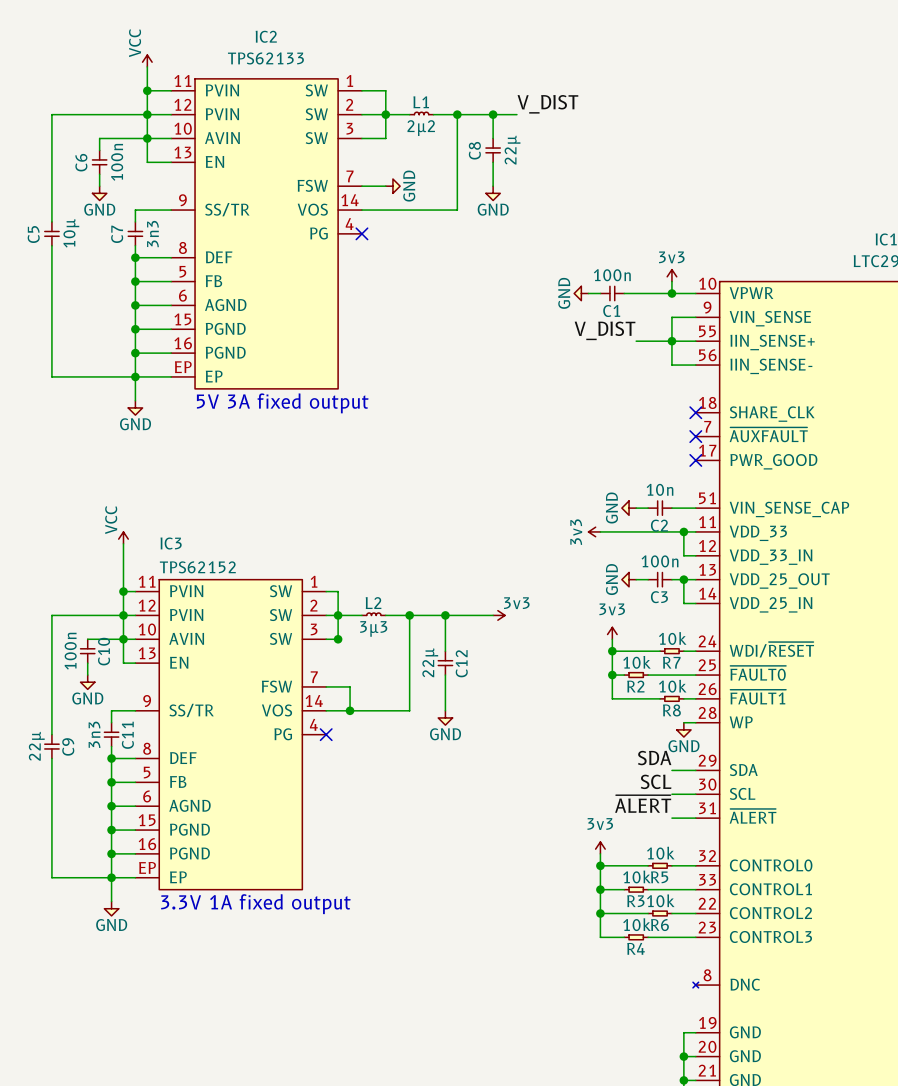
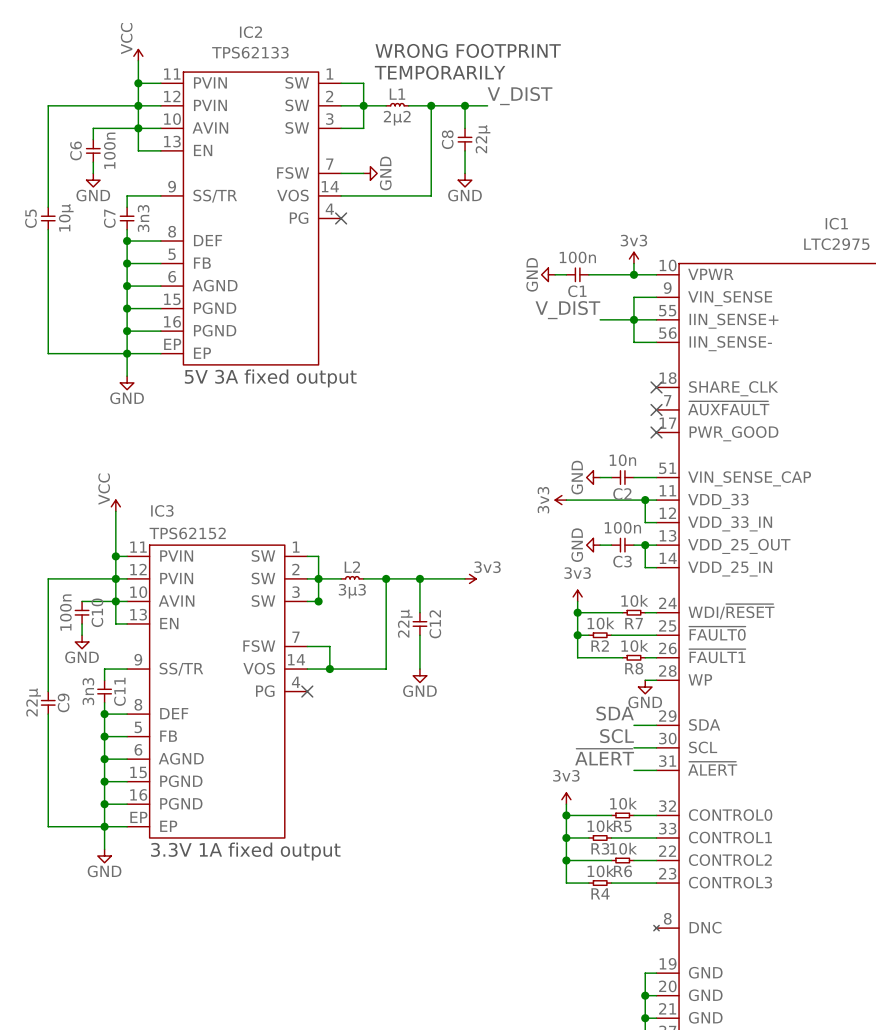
text: none -> WRONG FOOTPRINT (468, 50)
text: none -> TEMPORARILY (440, 72)

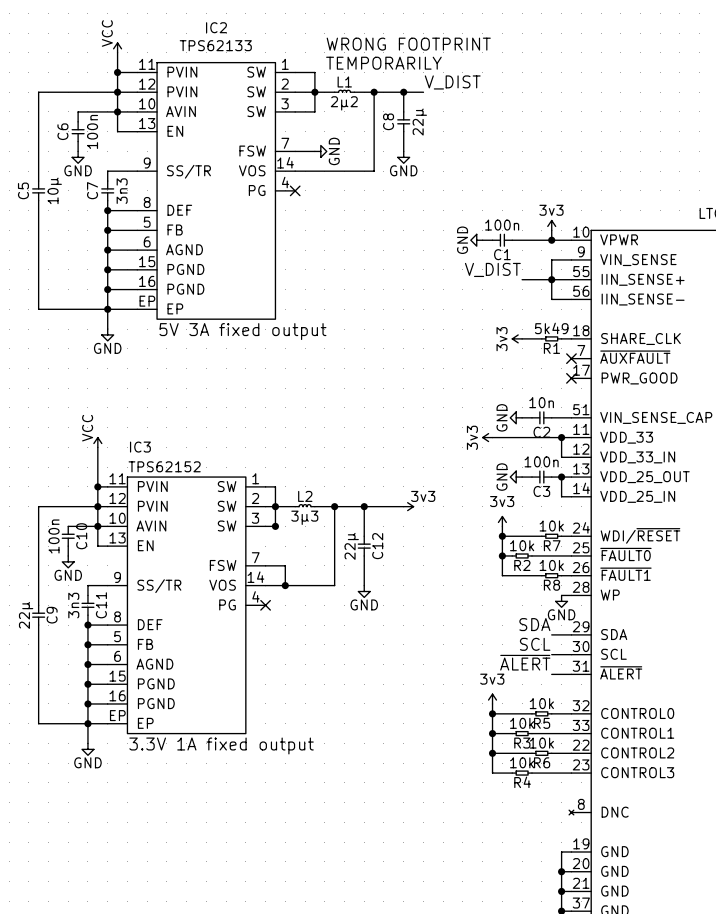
power symbol: none -> 3v3 (517, 338)
wire: none -> (522, 338) (541, 338)
R1: none -> 5k49 (551, 338)
wire: none -> (561, 338) (571, 338)
no-connect mark: (656, 387) -> none

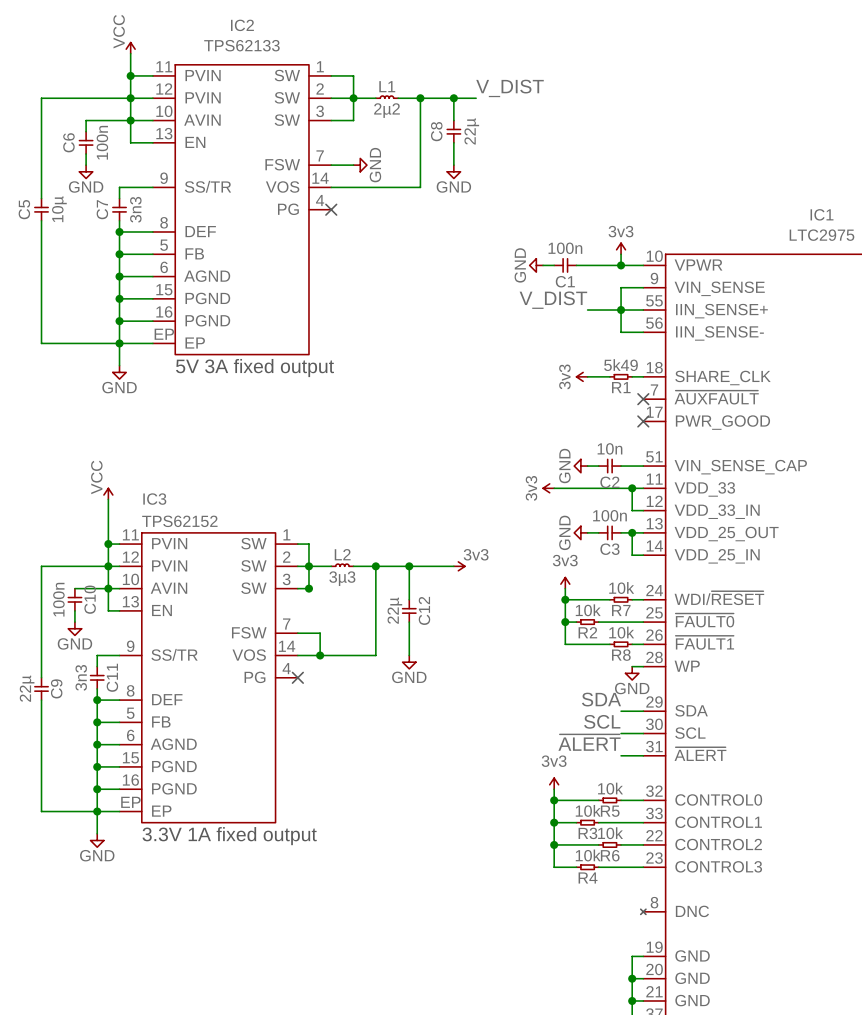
text: WRONG FOOTPRINT (408, 44) -> none
text: TEMPORARILY (383, 63) -> none

